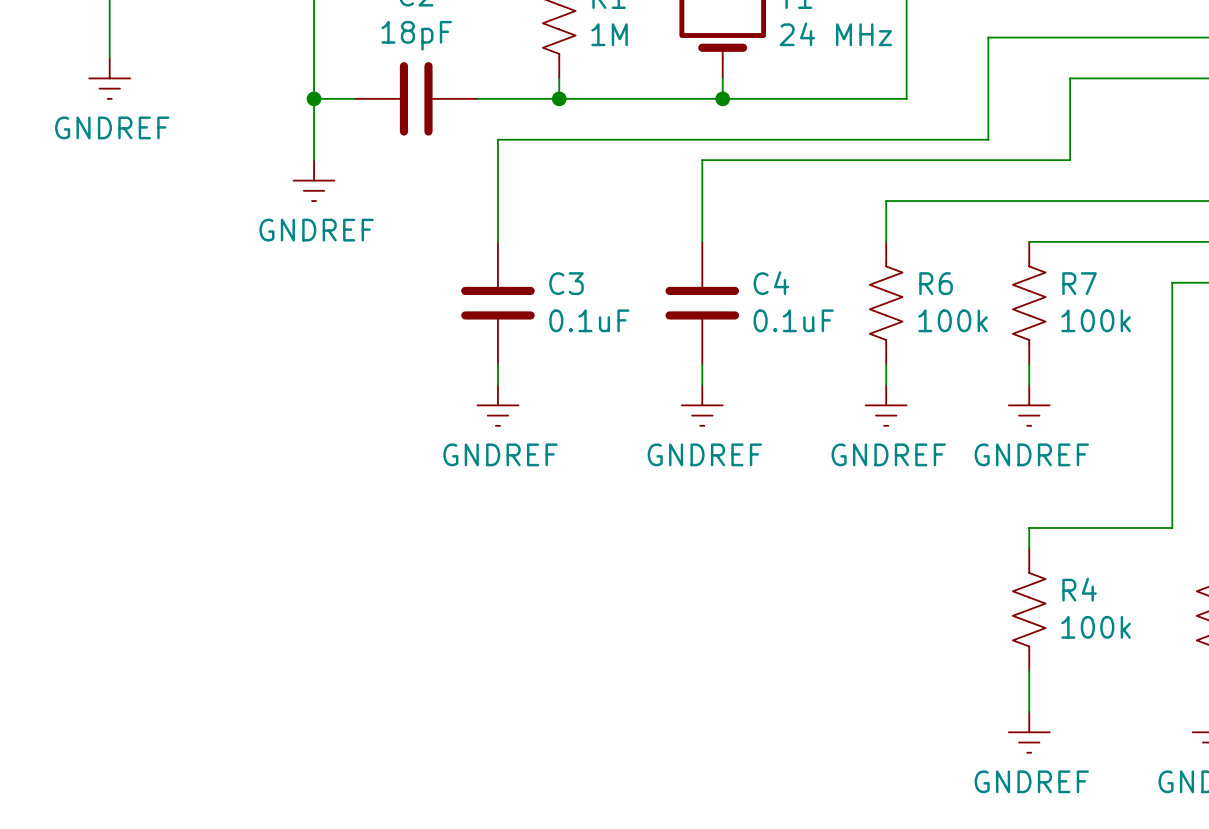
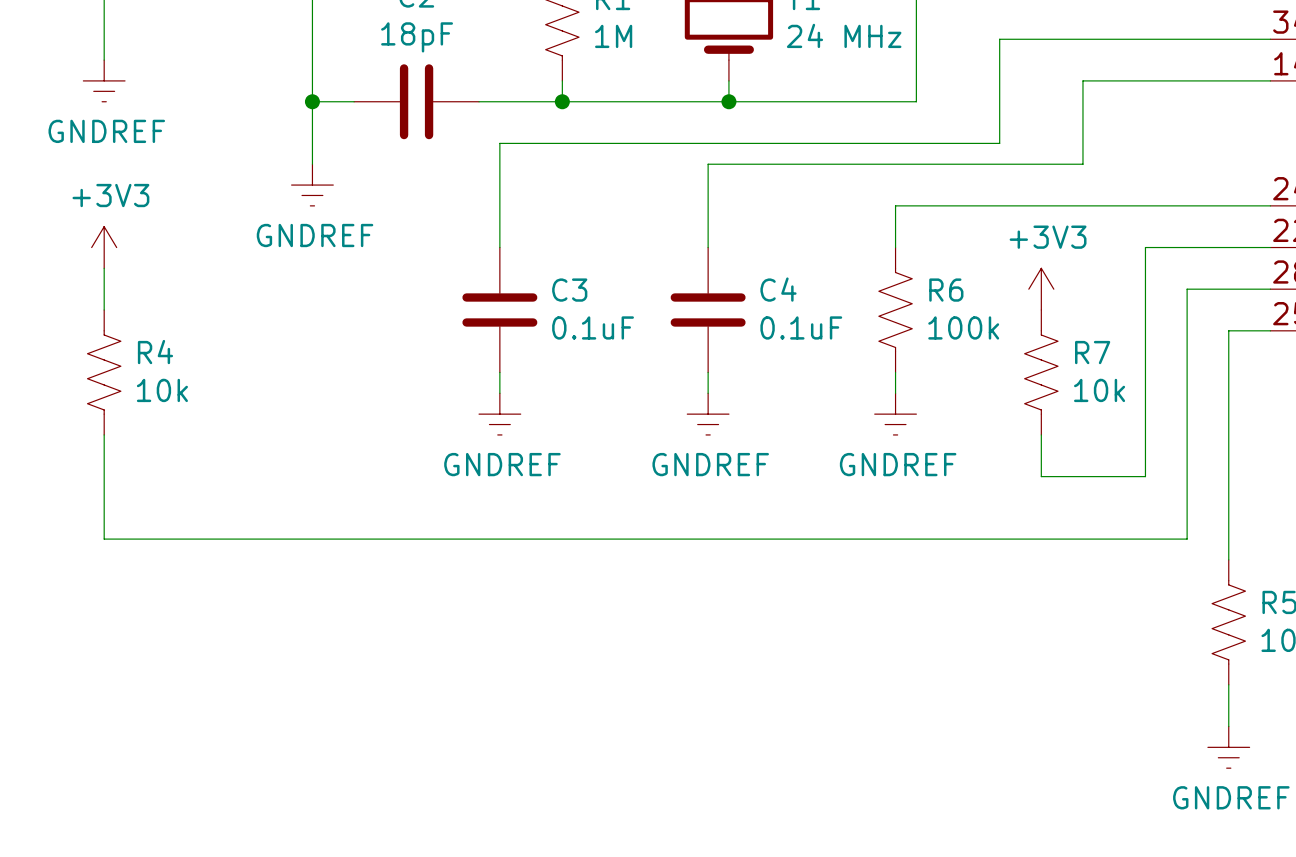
power symbol: none -> +3V3 (104, 247)
wire: (1029, 241) (1131, 241) -> (1041, 434) (1041, 476) (1145, 476) (1145, 247)
wire: none -> (104, 268) (104, 310)
power symbol: none -> +3V3 (1041, 289)
R7 position: (1029, 303) -> (1041, 372)
R7 value: 100k (1096, 320) -> 10k (1099, 390)
wire: (1029, 364) (1029, 384) -> none
power symbol: GNDREF (1029, 405) -> none
wire: (1029, 527) (1029, 548) -> (1041, 539) (104, 539) (104, 434)
R4 position: (1029, 609) -> (104, 372)
R4 value: 100k (1096, 627) -> 10k (162, 390)
wire: (1029, 671) (1029, 711) -> none
power symbol: GNDREF (1029, 732) -> none

